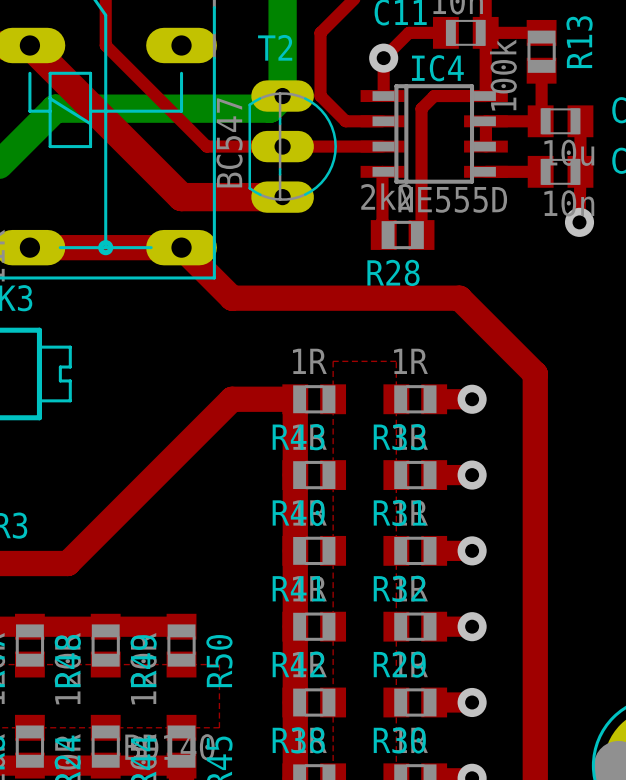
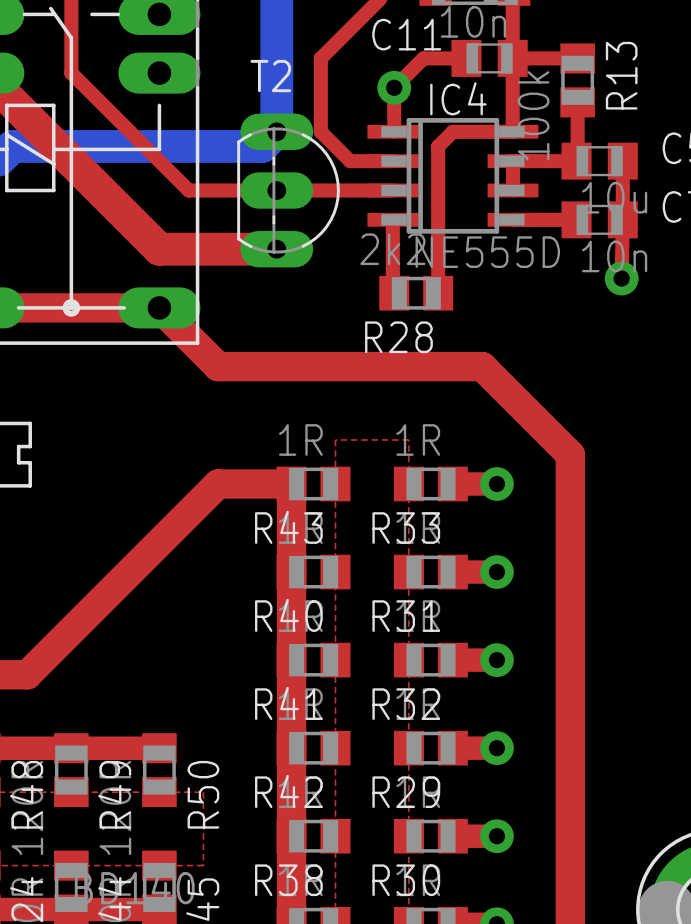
T2 value: BC547 (229, 142) -> none

